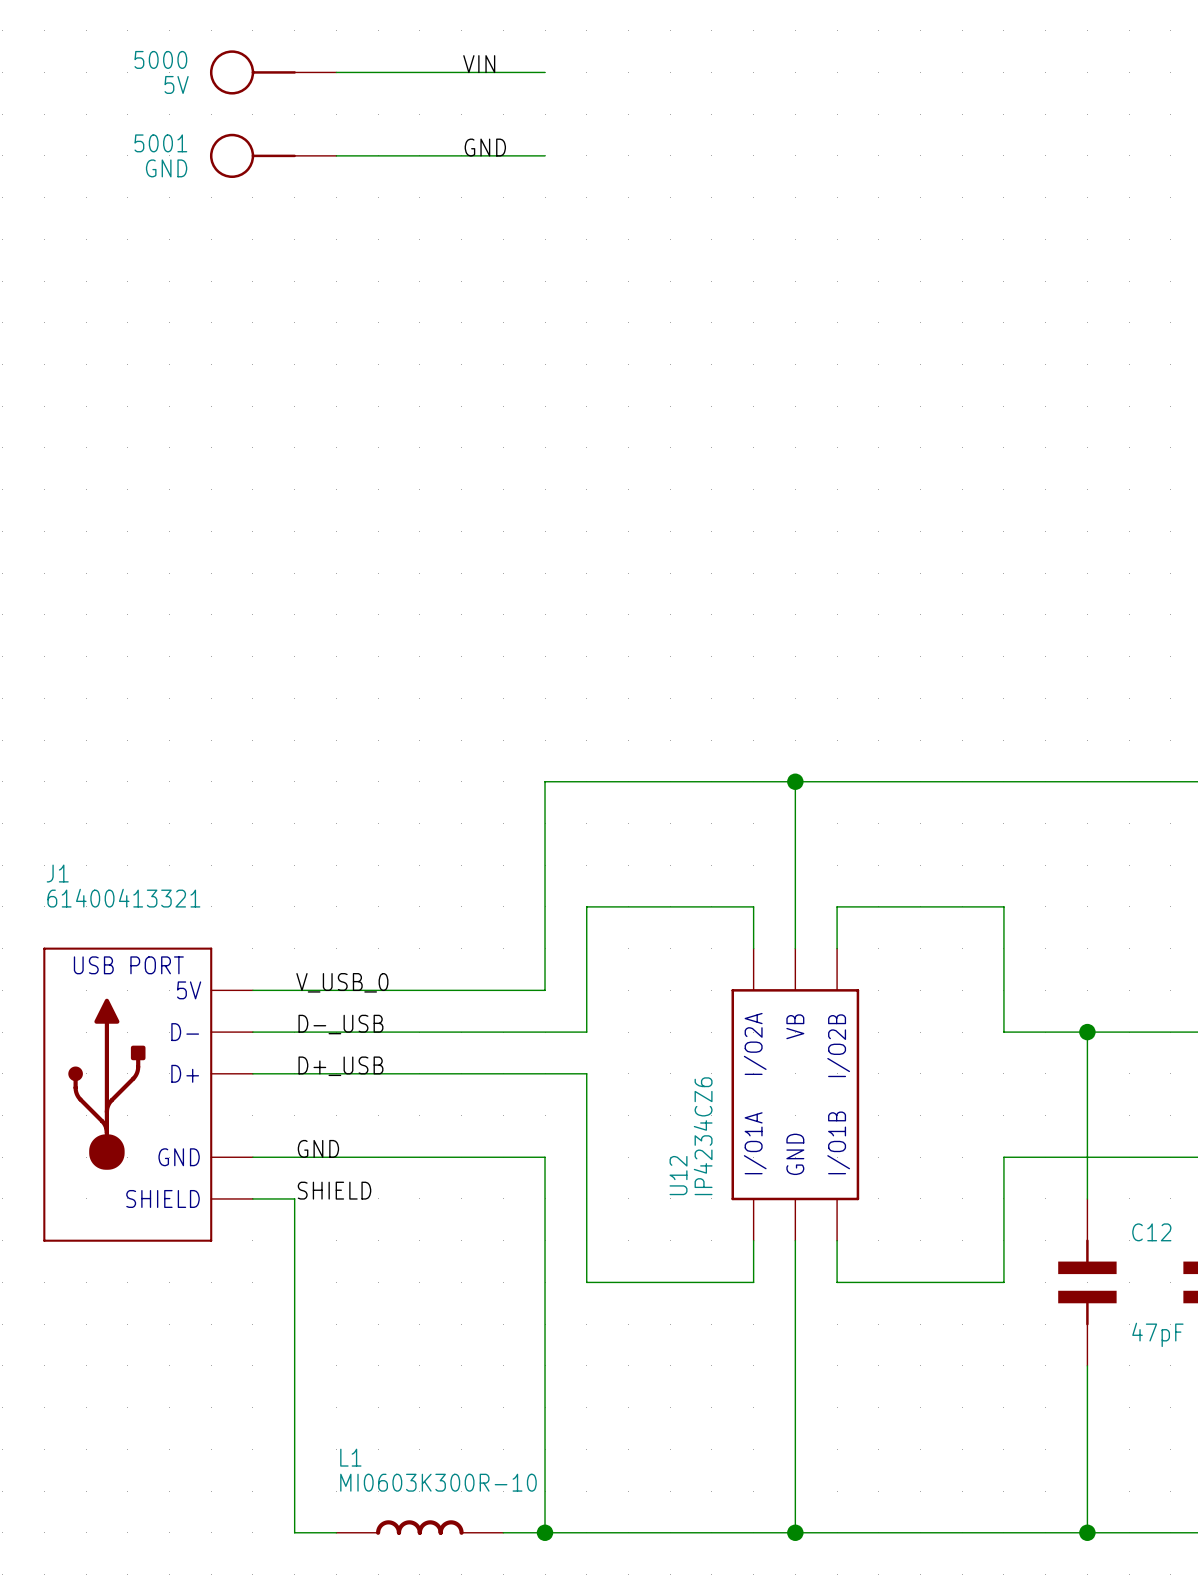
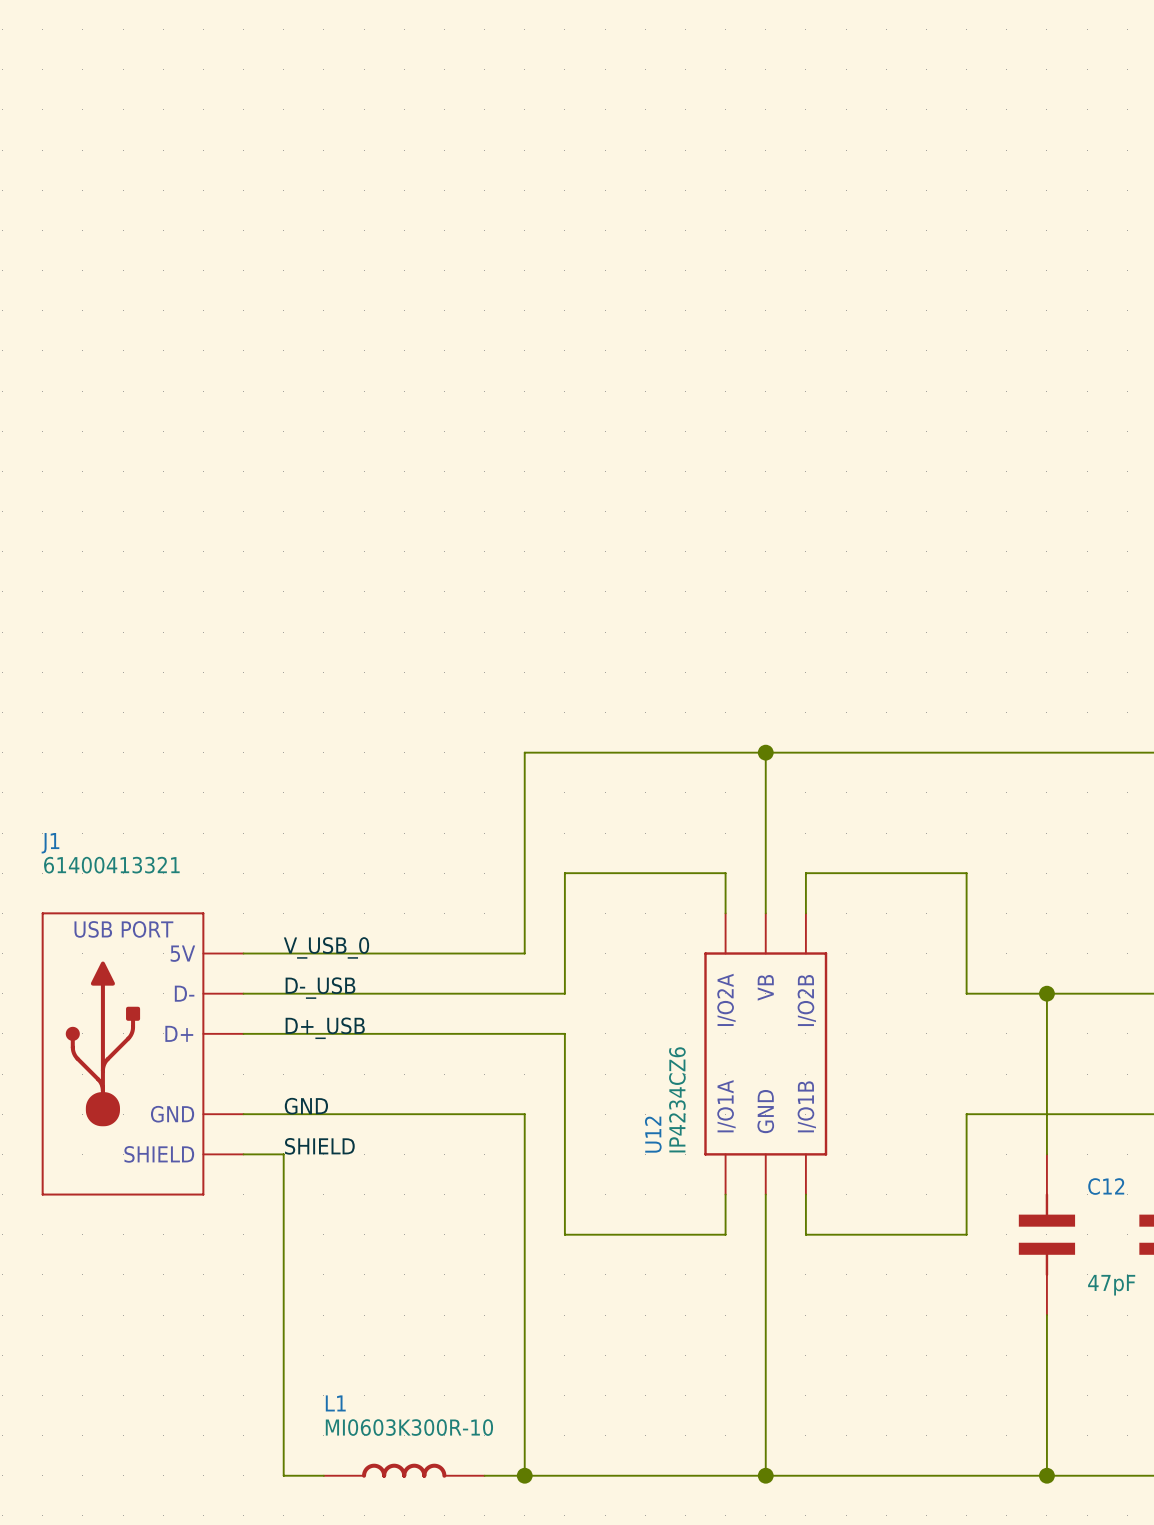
label: VIN (479, 64) -> none
5V: 5000 (273, 72) -> none
wire: (336, 72) (545, 72) -> none
label: GND (485, 147) -> none
GND: 5001 (273, 155) -> none
wire: (336, 155) (545, 155) -> none

